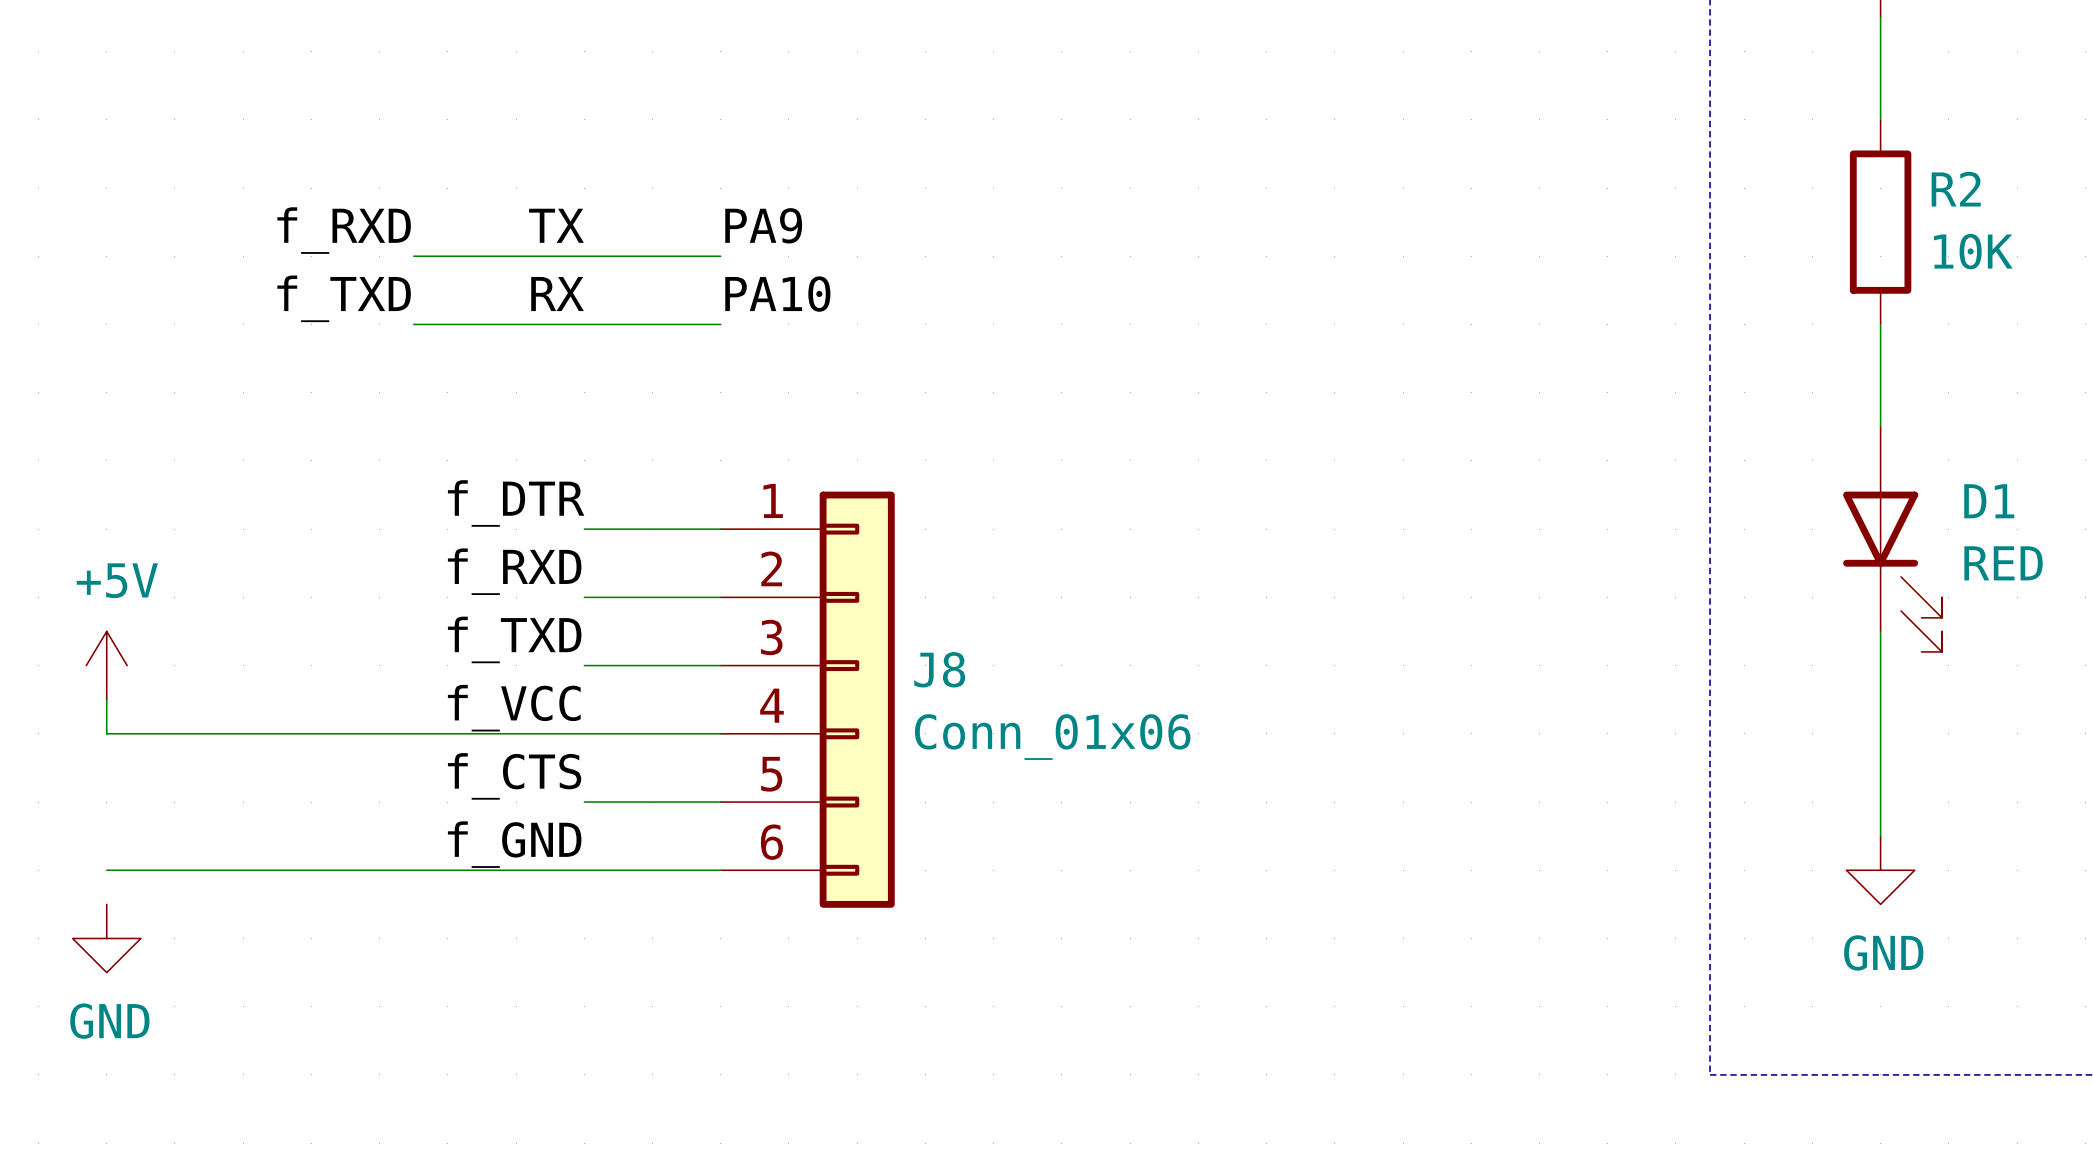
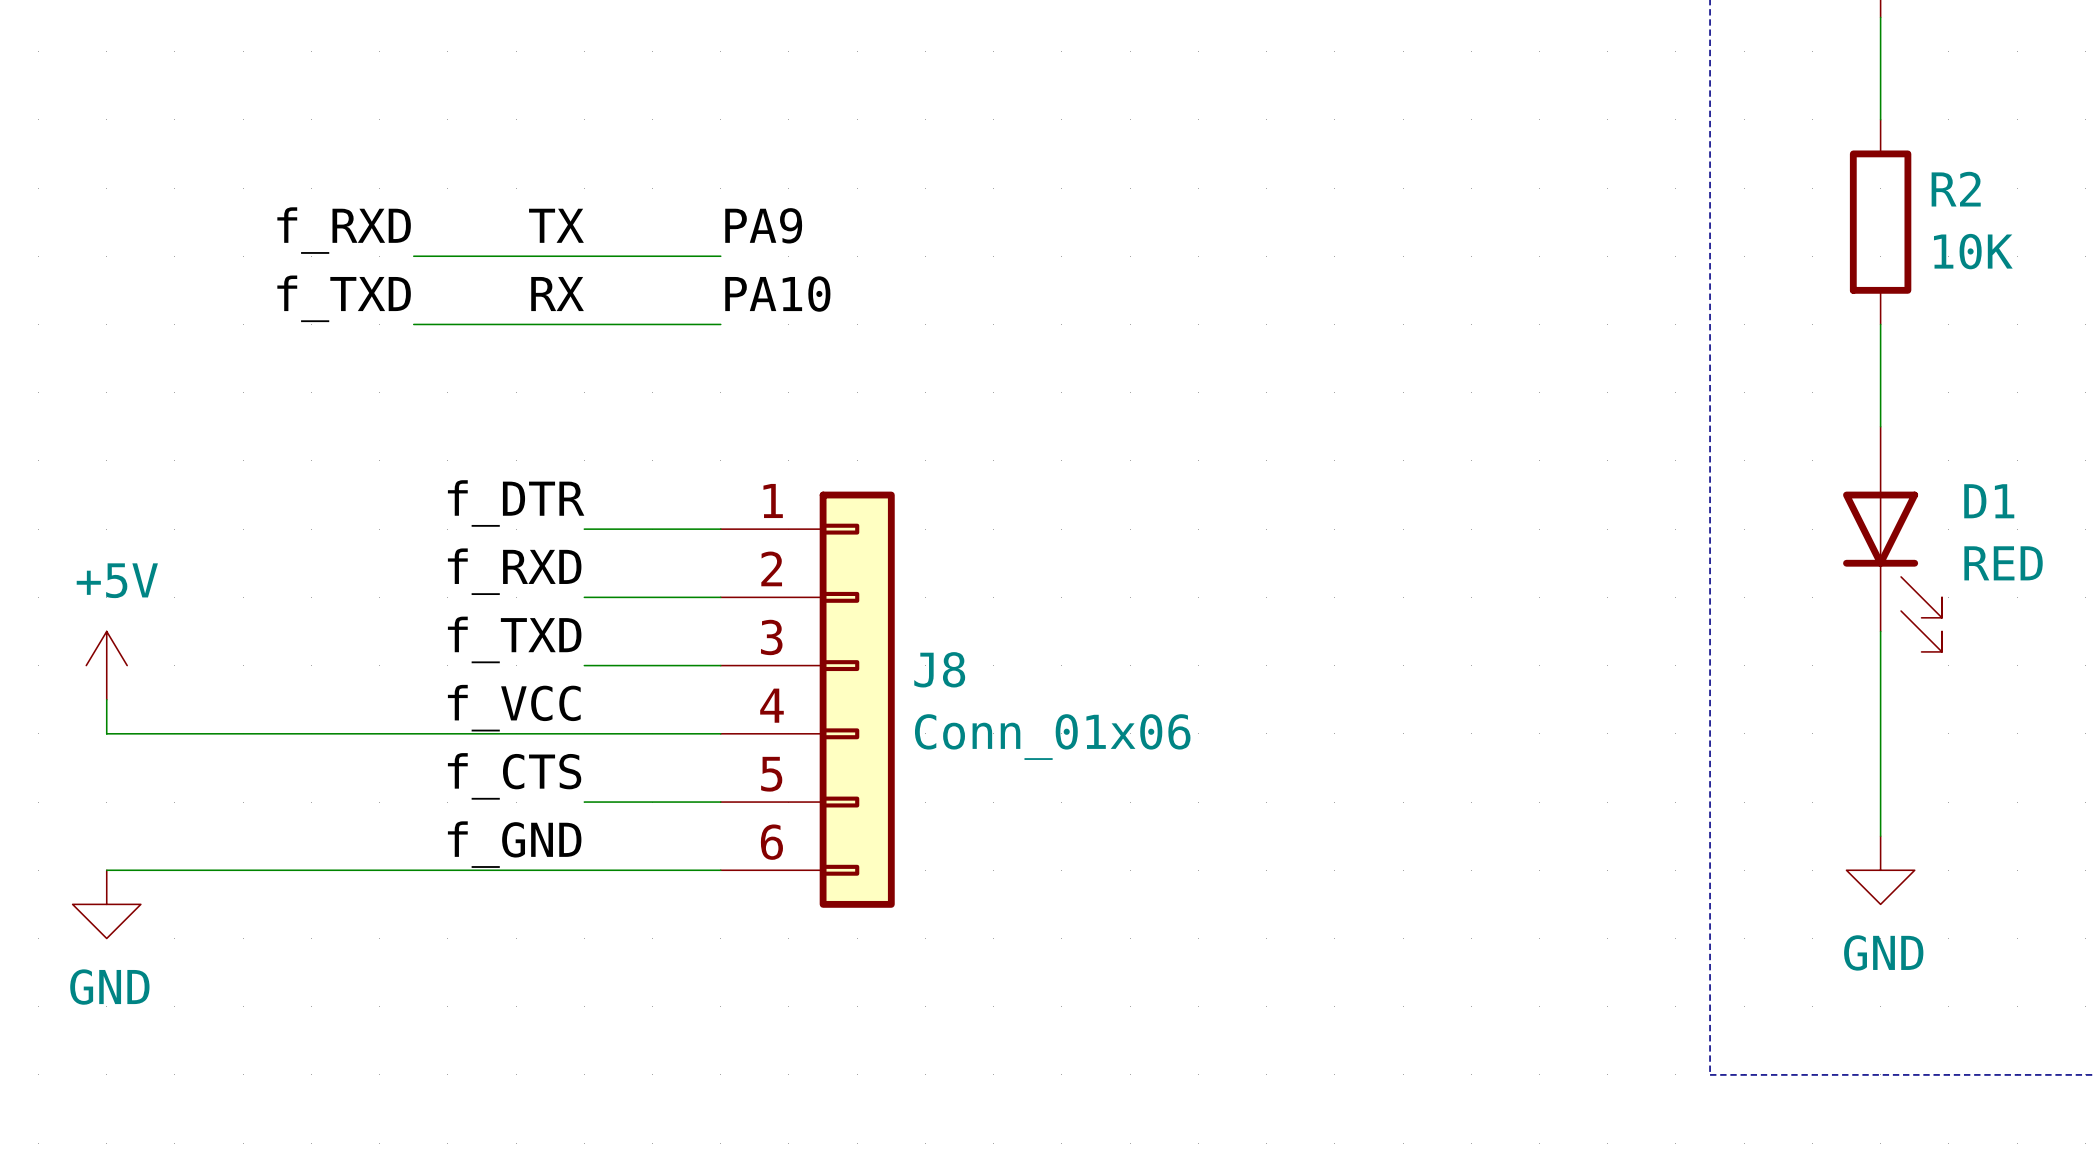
power symbol position: GND (106, 938) -> GND (106, 904)

